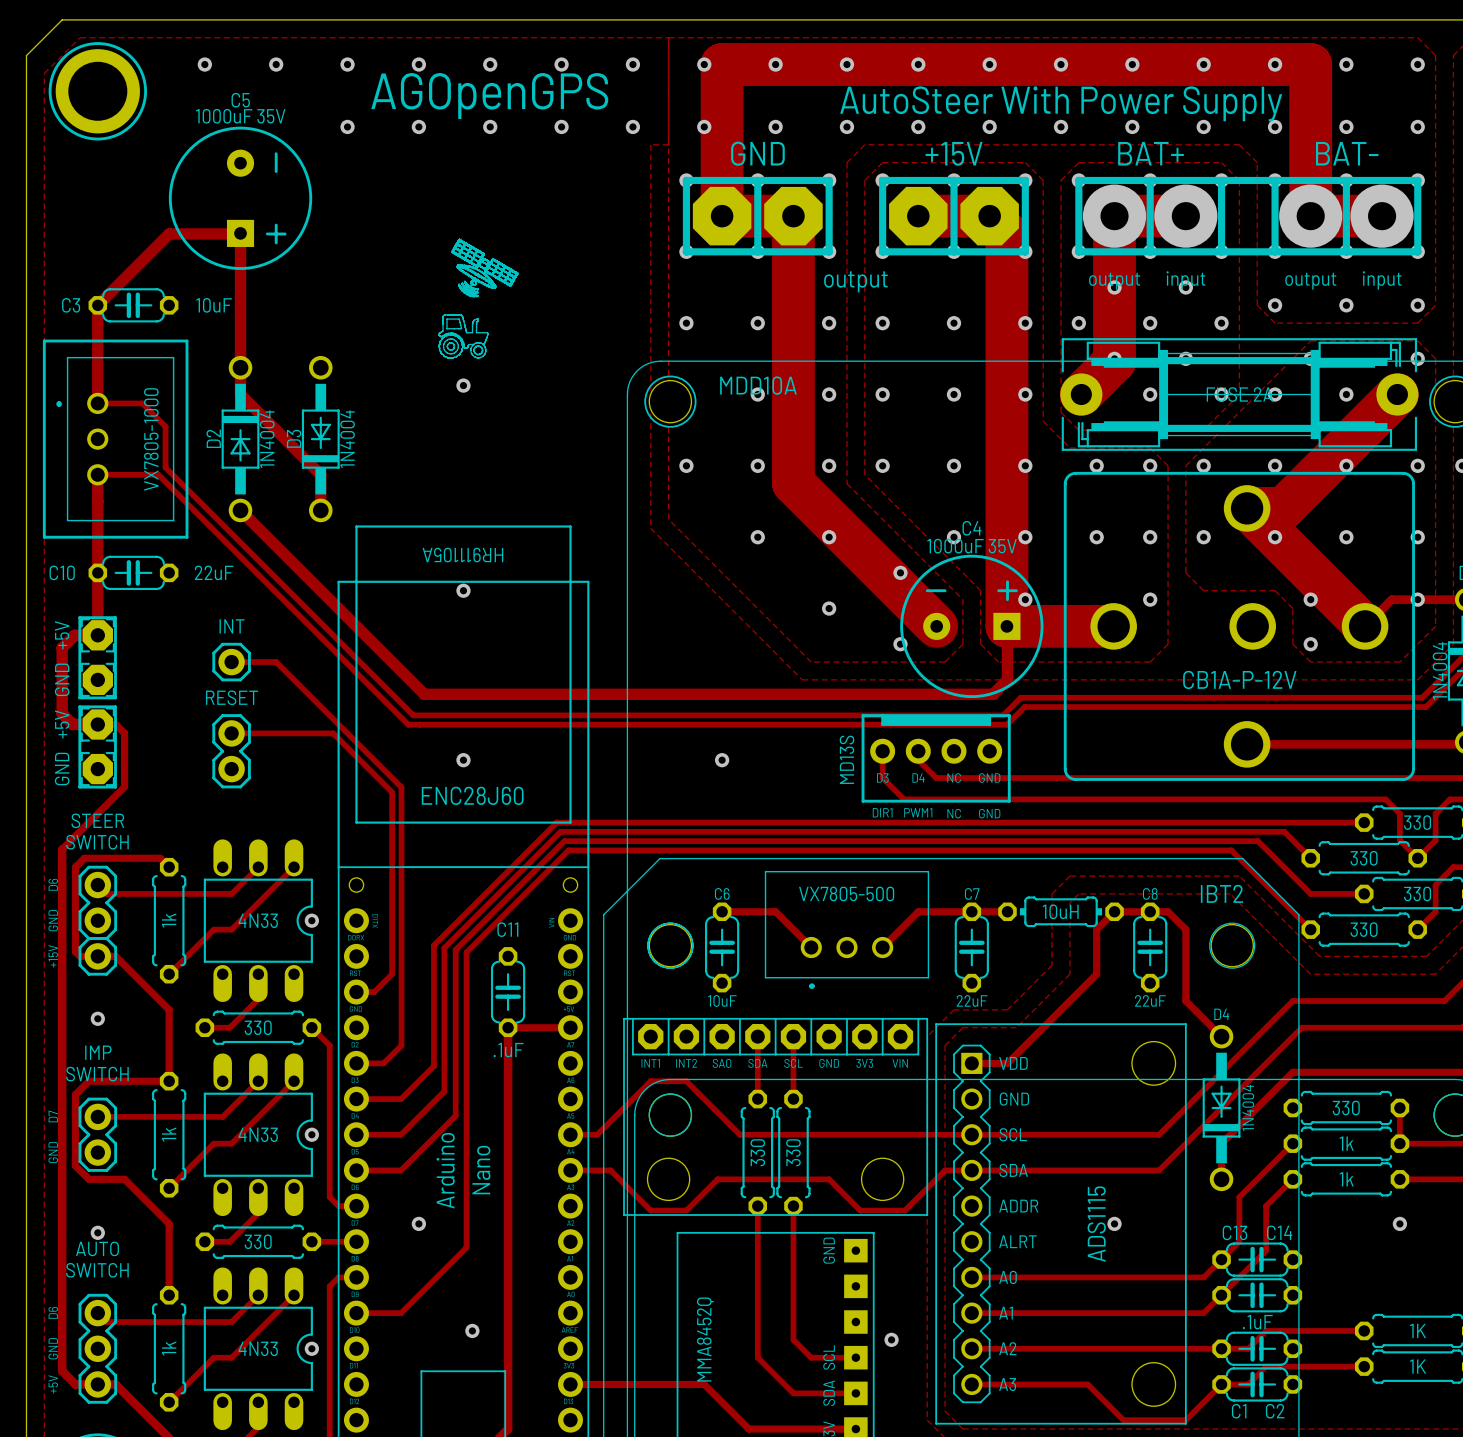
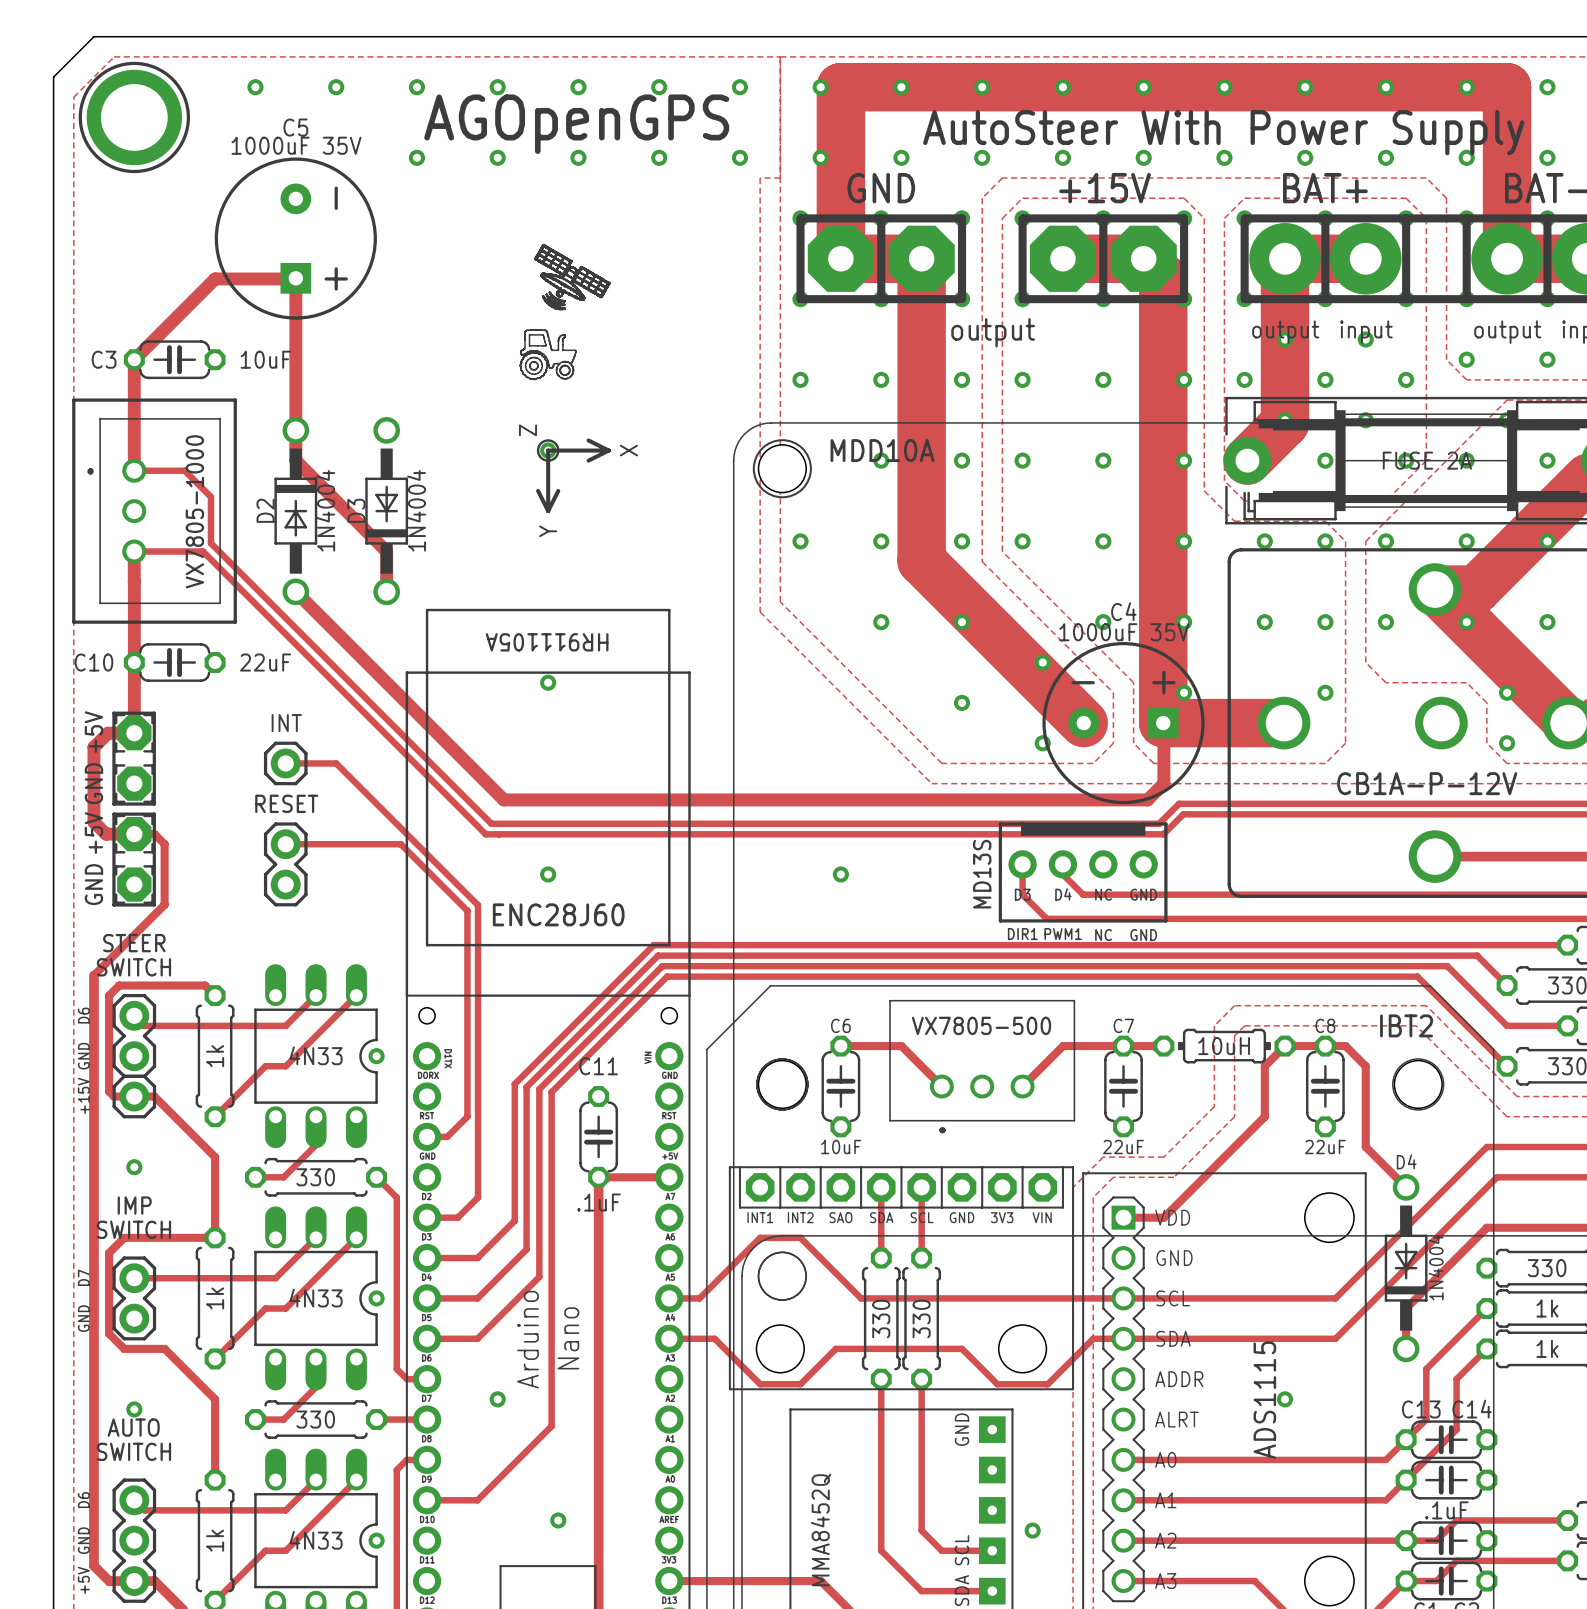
drawing position: (484, 268) -> (572, 277)
drawing position: (463, 336) -> (548, 354)
text: none -> Z (527, 430)
drawing: none -> [536, 439, 560, 462]
line: none -> (588, 440) (608, 450)
line: none -> (608, 450) (548, 450) (548, 511)
line: none -> (608, 450) (588, 460)
text: none -> X (628, 450)
line: none -> (538, 490) (548, 511)
line: none -> (558, 490) (548, 511)
text: none -> Y (548, 531)

